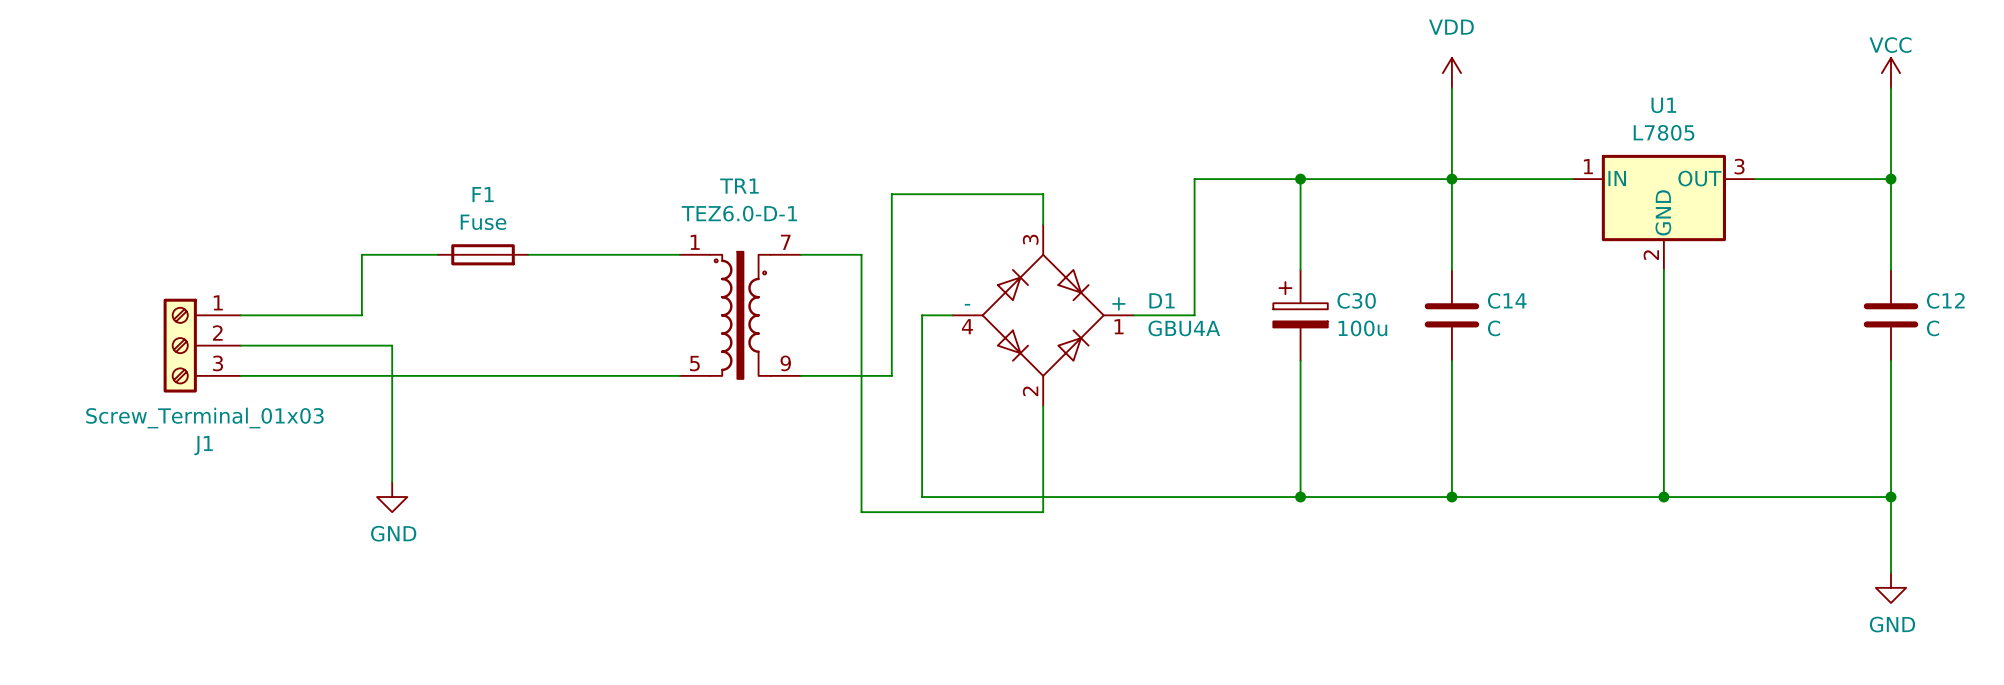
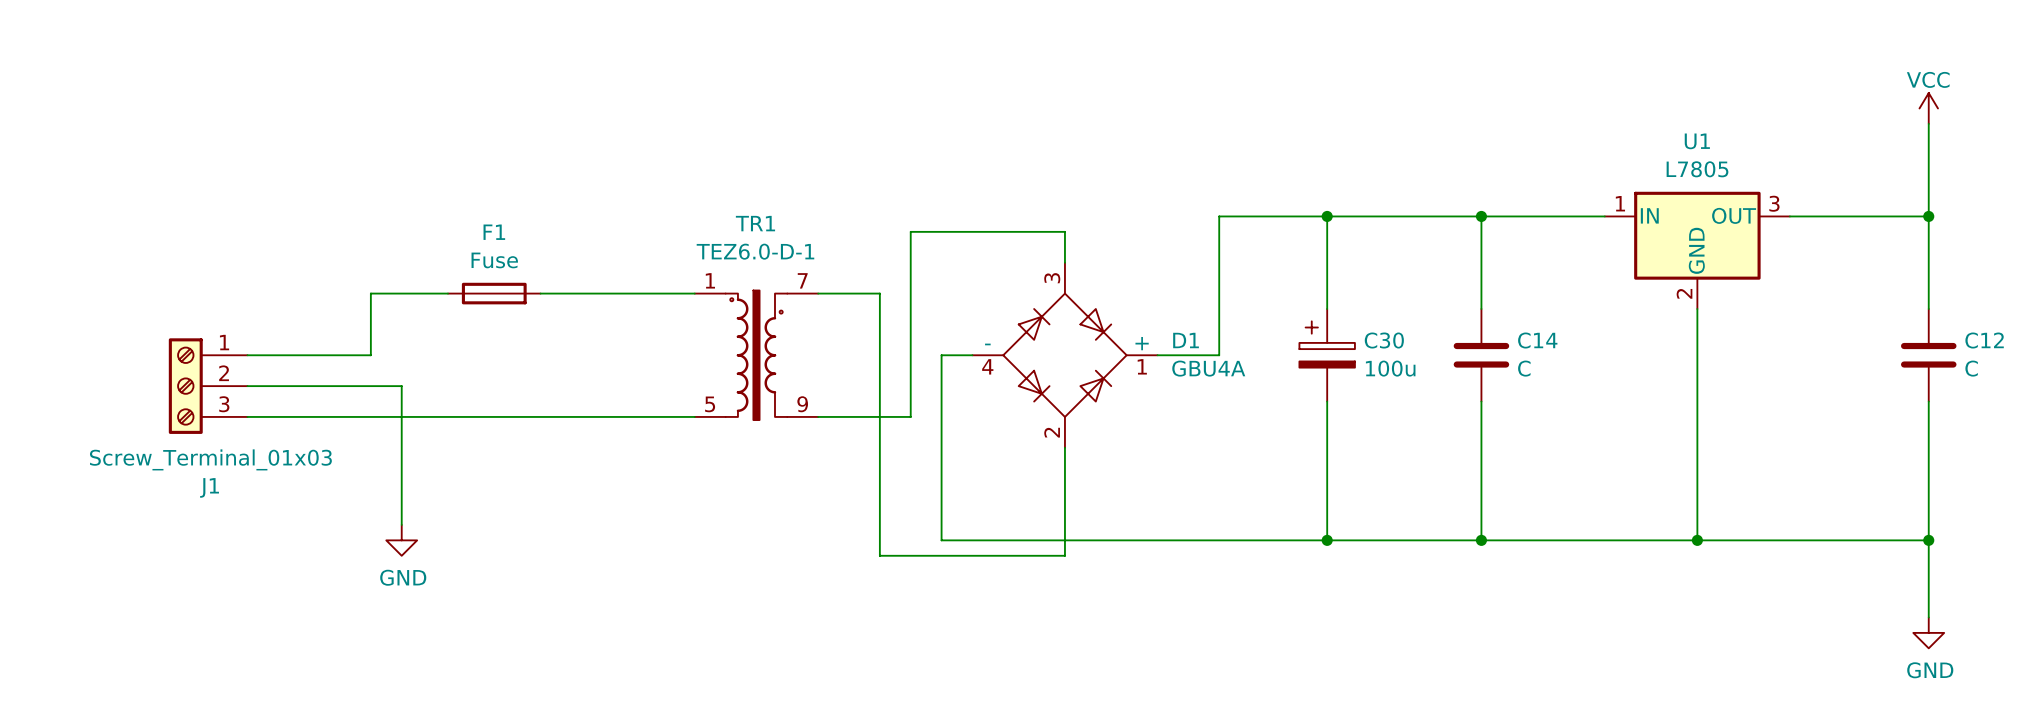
power symbol: VDD (1451, 73) -> none
wire: (1451, 88) (1451, 179) -> none

